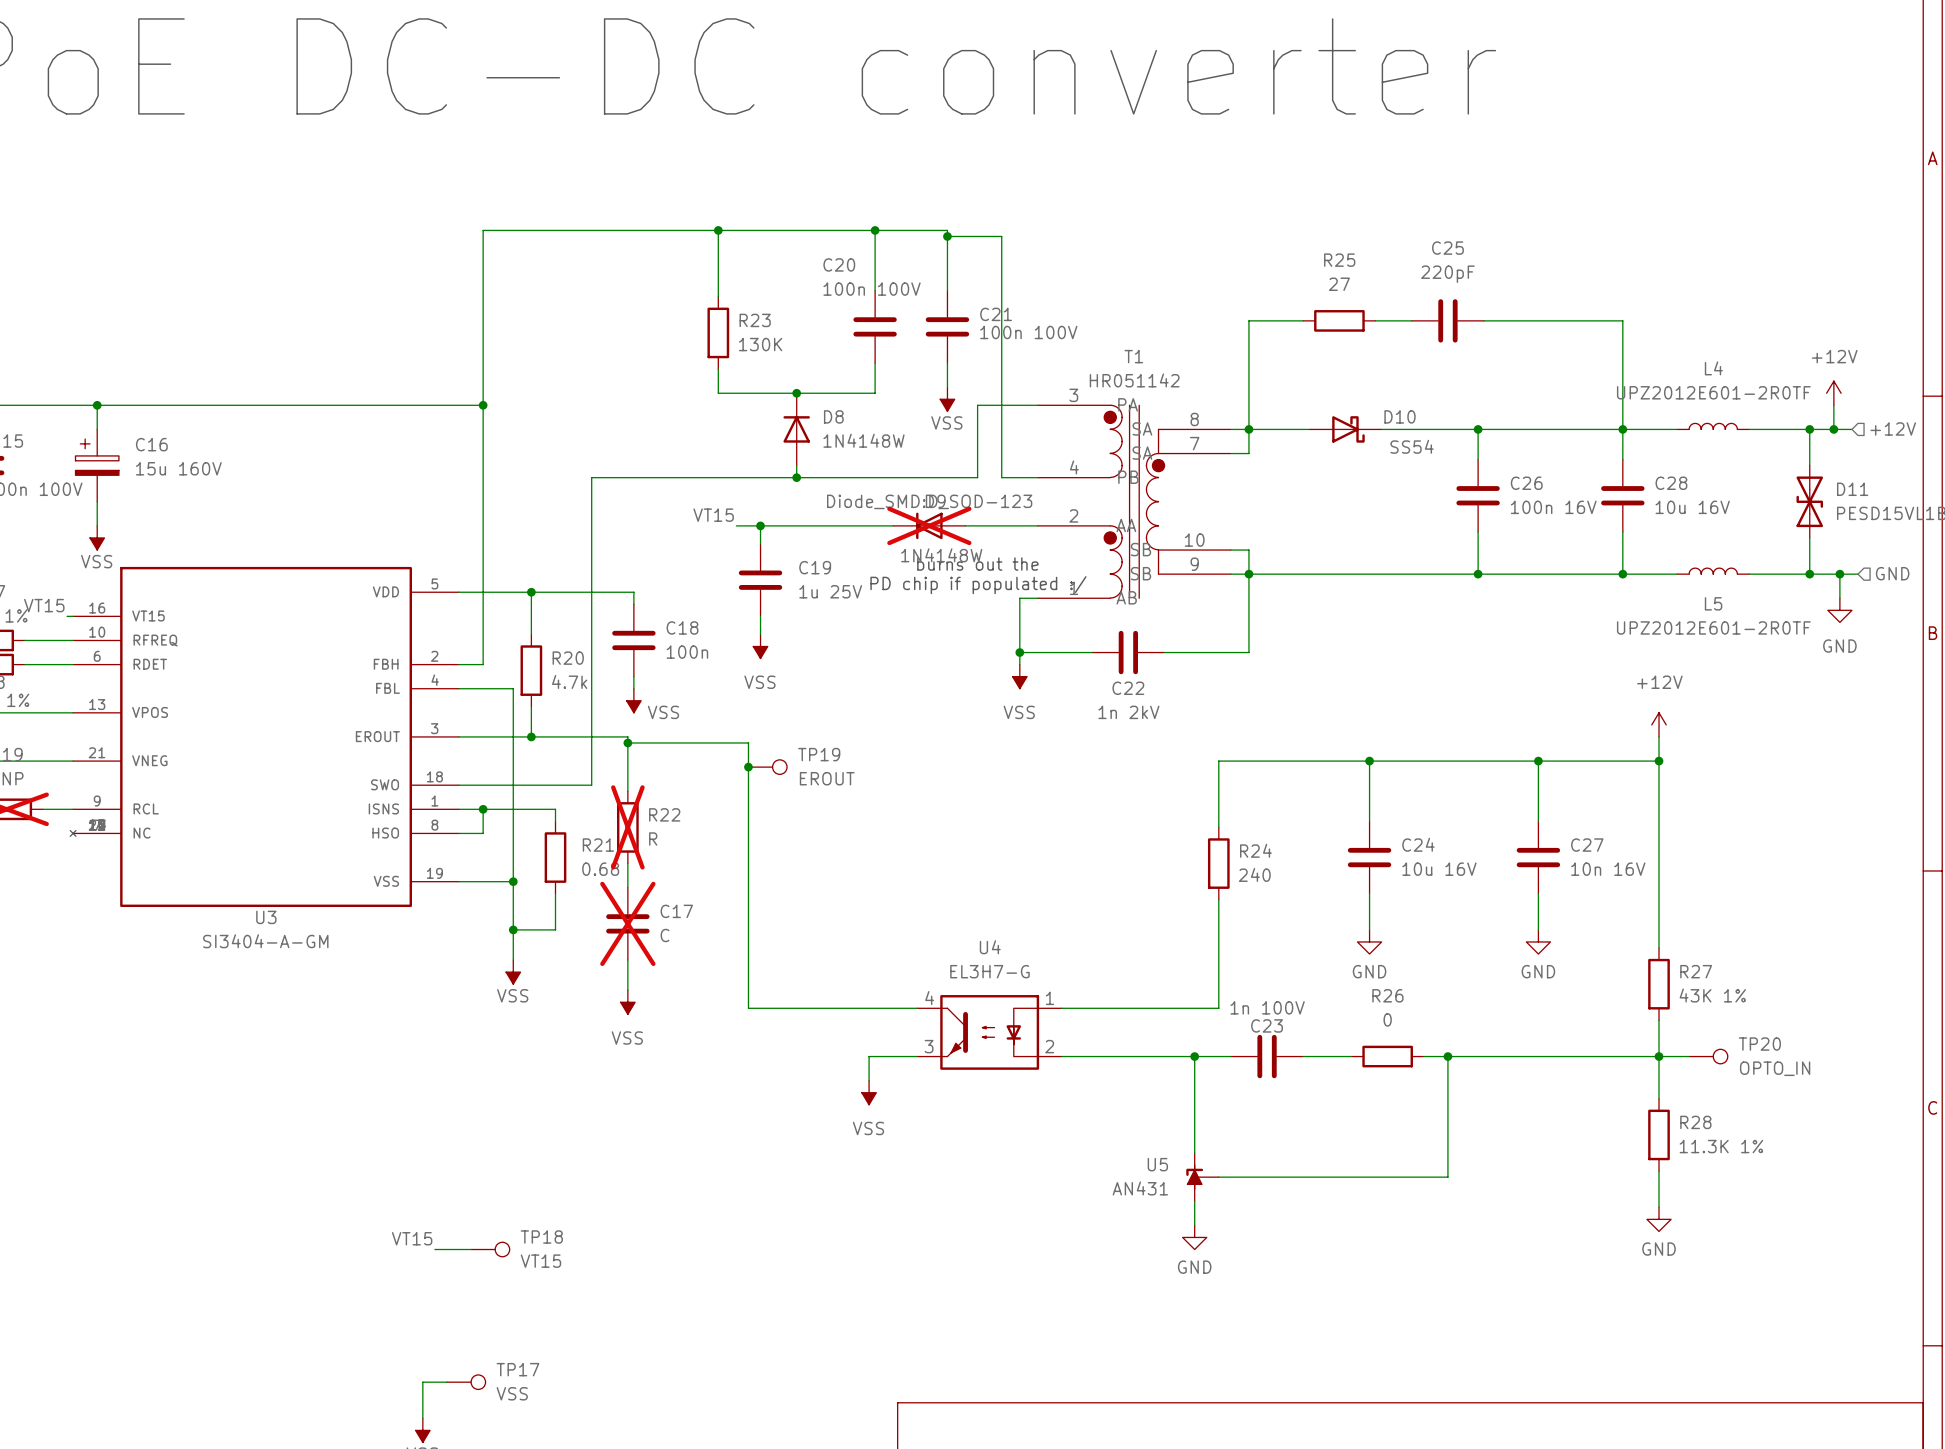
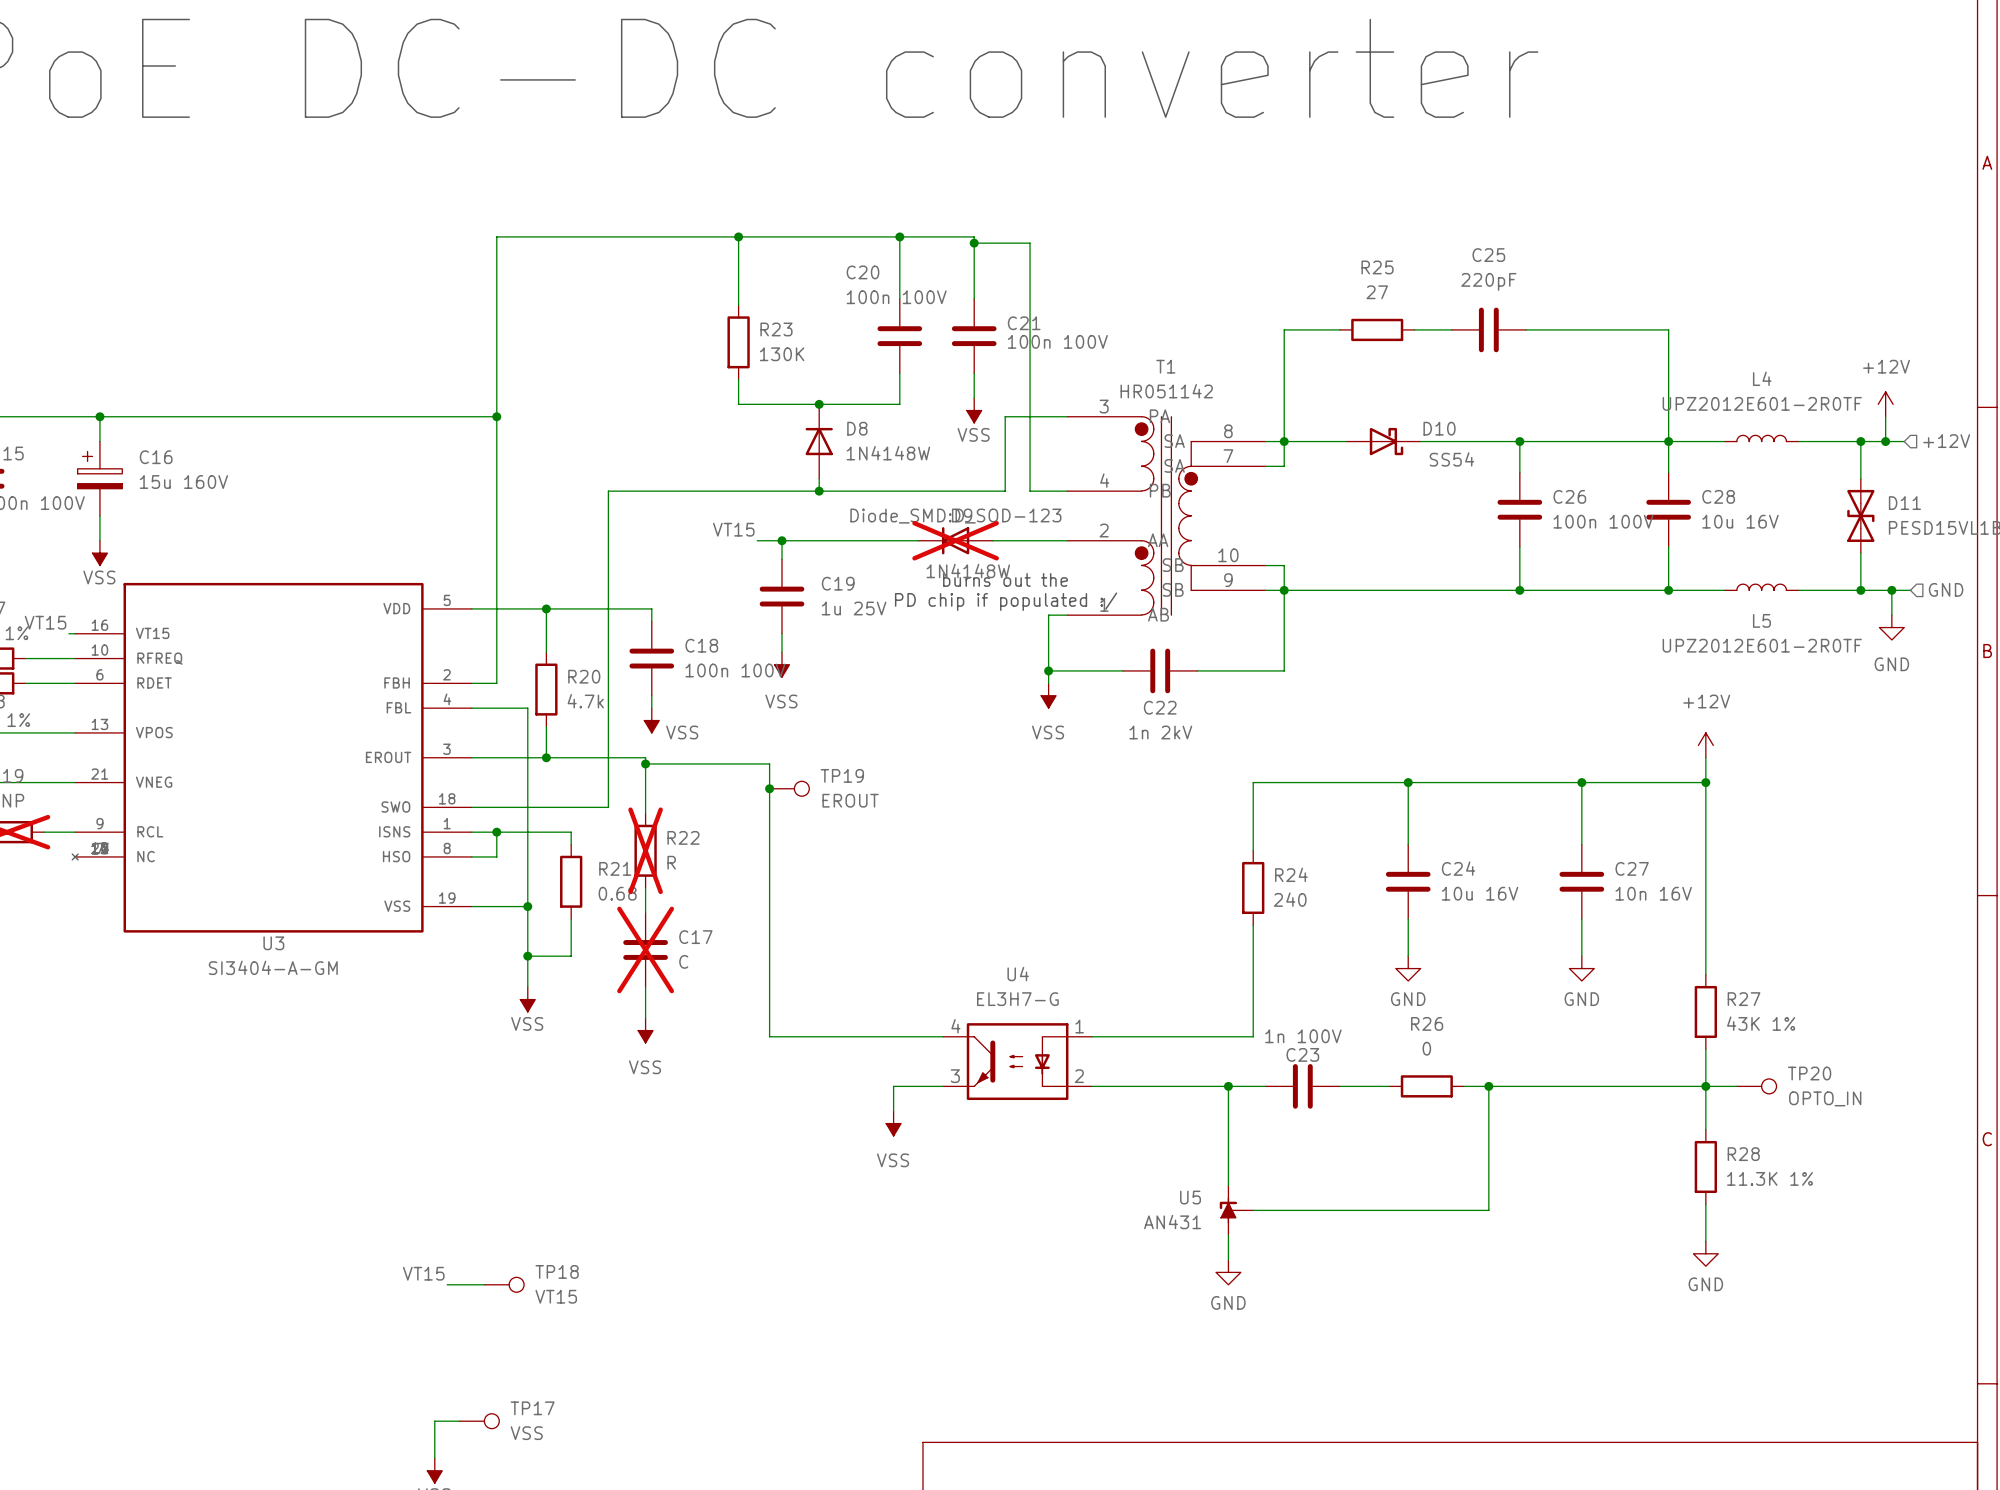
C26 value: 100n 16V (1553, 507) -> 100n 100V (1603, 521)
C18 value: 100n (687, 652) -> 100n 100V (735, 670)

